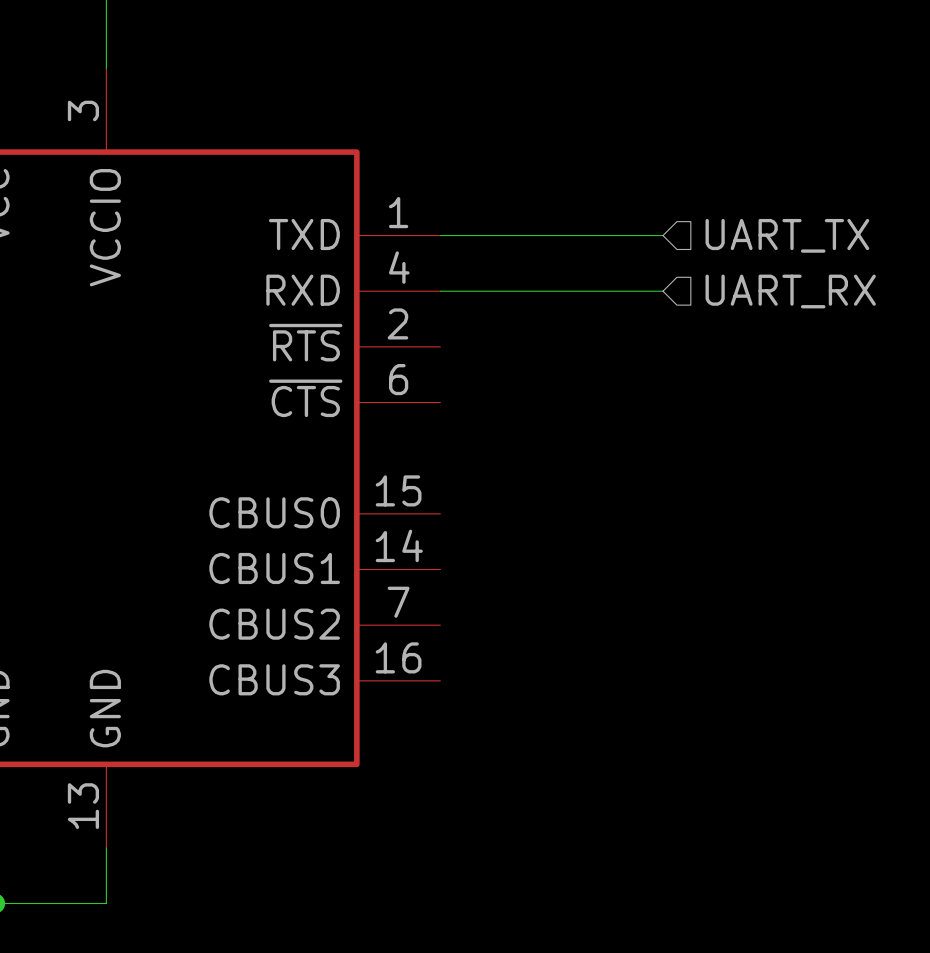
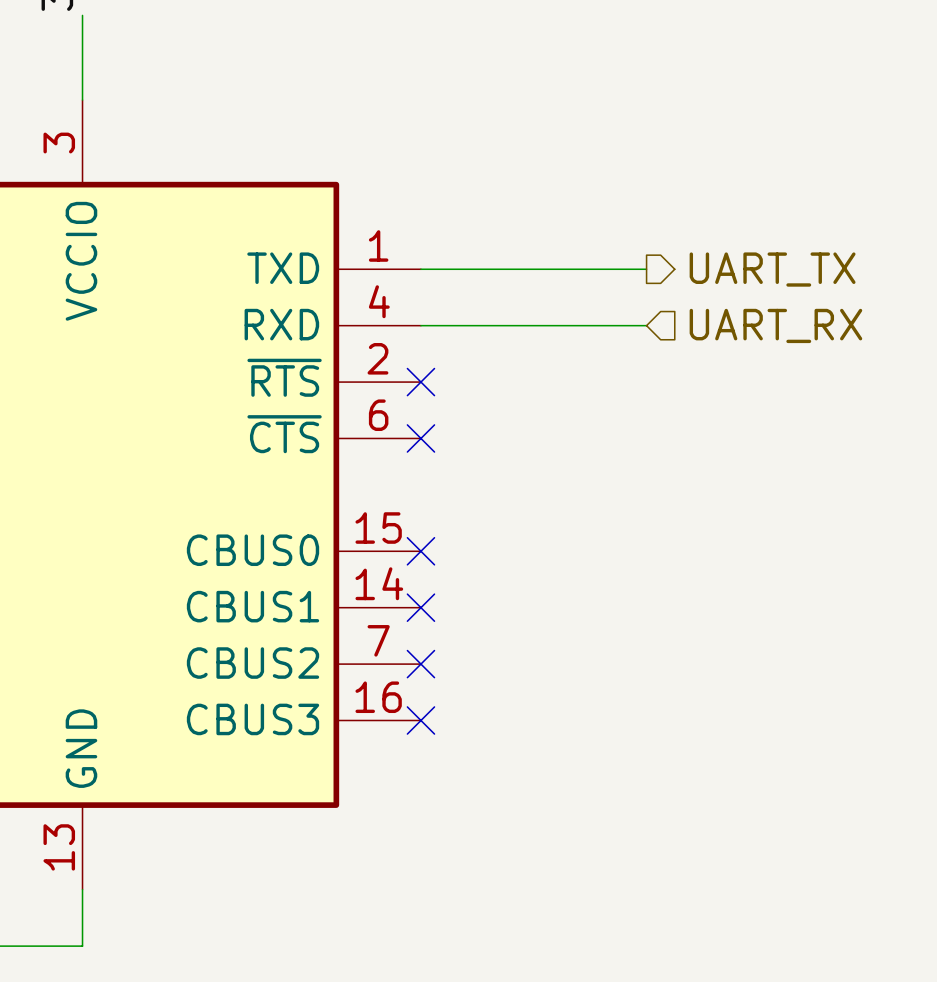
hierarchical label shape: input (787, 235) -> output (772, 269)
no-connect mark: none -> (420, 382)
no-connect mark: none -> (420, 438)
no-connect mark: none -> (420, 551)
no-connect mark: none -> (420, 607)
no-connect mark: none -> (420, 664)
no-connect mark: none -> (420, 720)

